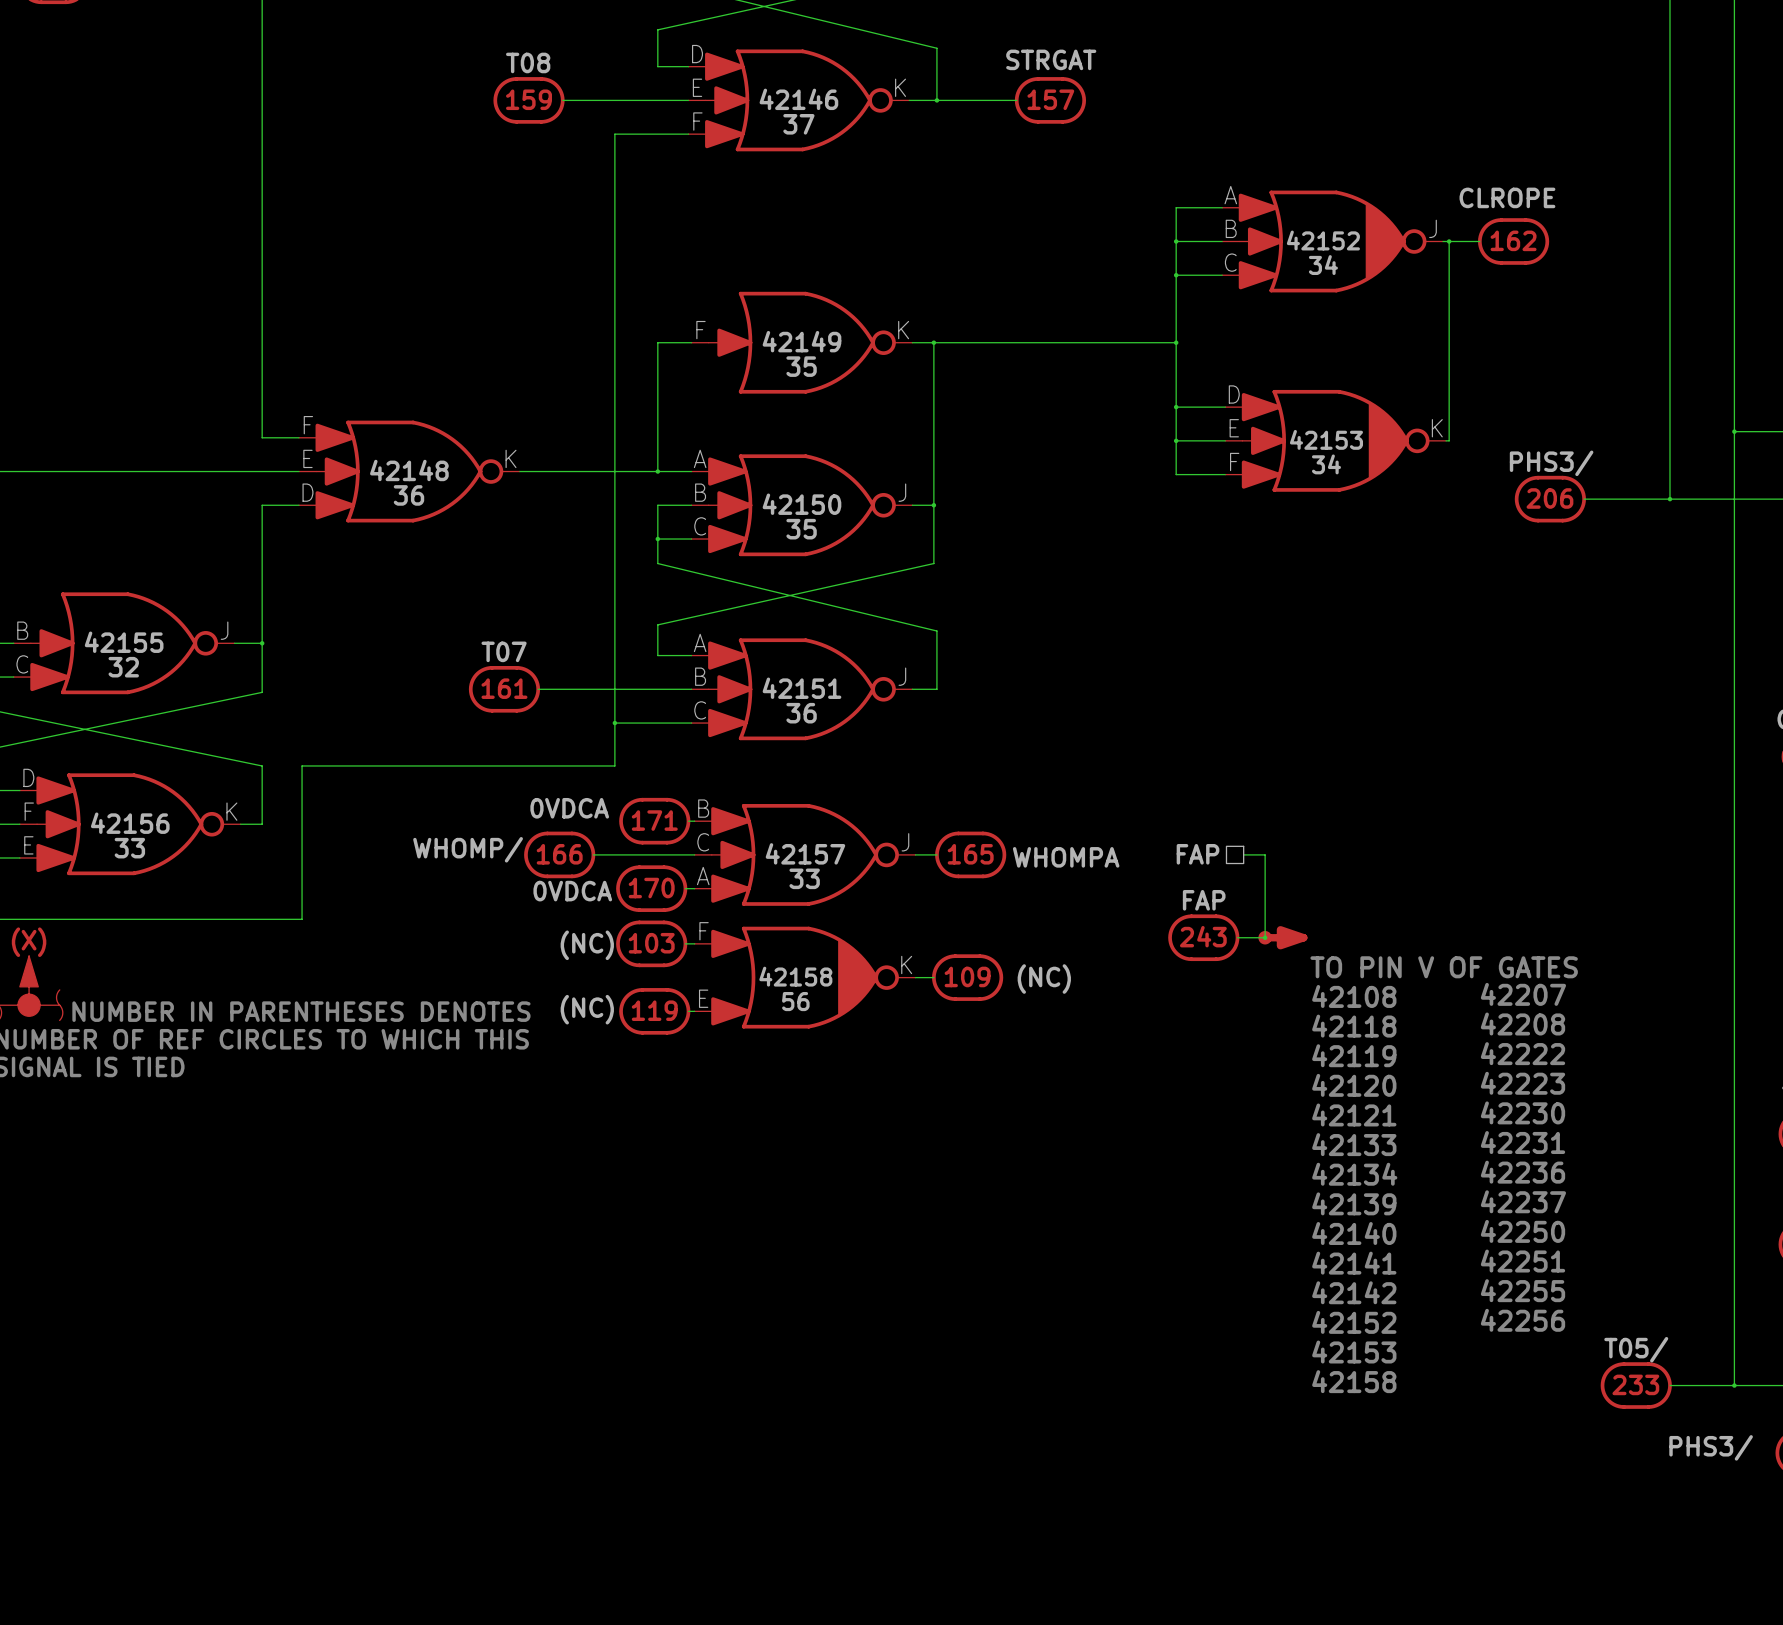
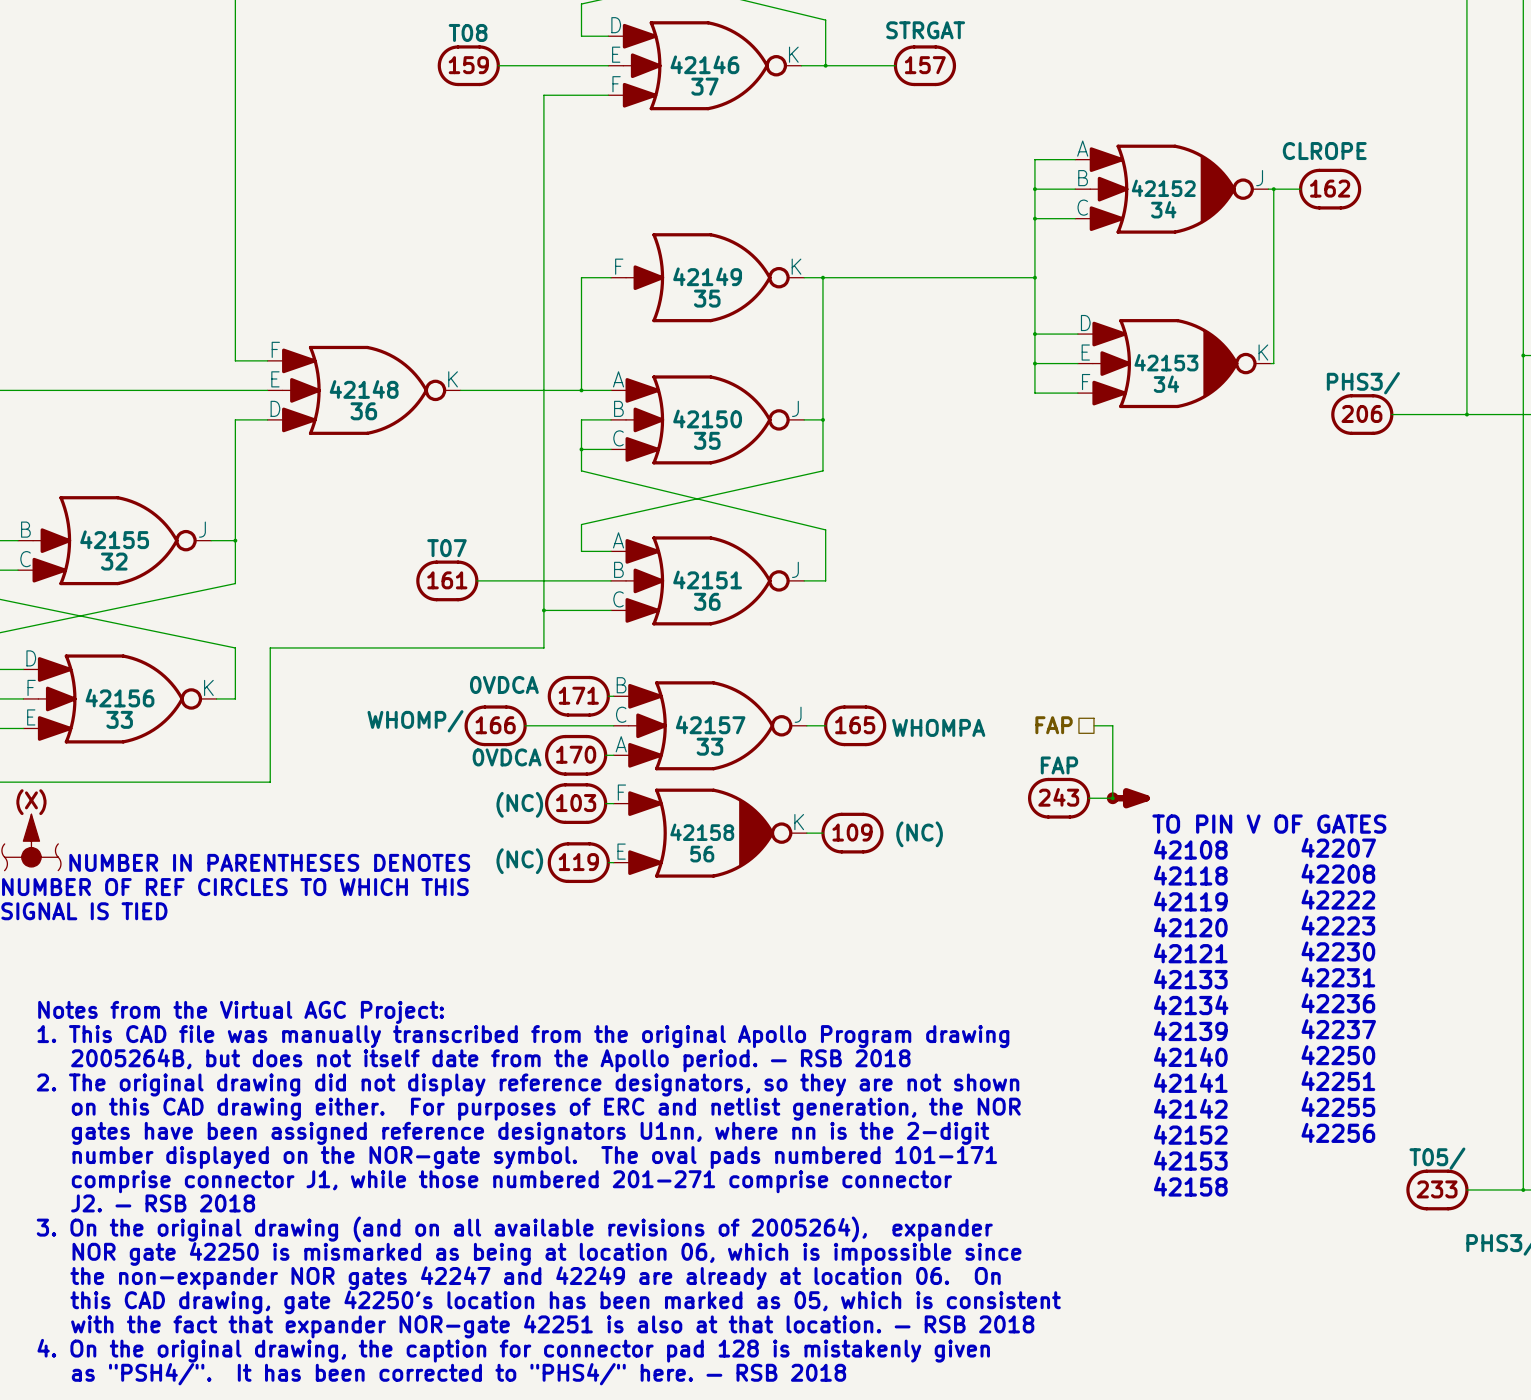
text: none -> Notes from the Virtual AGC Project: (241, 1012)
text: none -> 1. This CAD file was manually transcribed from the original Apollo Program drawing (523, 1036)
text: none -> 2005264B, but does not itself date from the Apollo period. — RSB 2018 (490, 1060)
text: none -> 2. The original drawing did not display reference designators, so they are not shown (528, 1084)
text: none -> on this CAD drawing either. For purposes of ERC and netlist generation, the NOR (546, 1109)
text: none -> gates have been assigned reference designators U1nn, where nn is the 2-digit (530, 1133)
text: none -> number displayed on the NOR-gate symbol. The oval pads numbered 101-171 (534, 1157)
text: none -> comprise connector J1, while those numbered 201-271 comprise connector (511, 1181)
text: none -> J2. — RSB 2018 (163, 1203)
text: none -> 3. On the original drawing (and on all available revisions of 2005264), expander (514, 1229)
text: none -> NOR gate 42250 is mismarked as being at location 06, which is impossible since (546, 1253)
text: none -> the non-expander NOR gates 42247 and 42249 are already at location 06. On (535, 1278)
text: none -> this CAD drawing, gate 42250's location has been marked as 05, which is consistent (565, 1302)
text: none -> with the fact that expander NOR-gate 42251 is also at that location. — RSB 2018 (552, 1326)
text: none -> 4. On the original drawing, the caption for connector pad 128 is mistakenly given (513, 1350)
text: none -> as "PSH4/". It has been corrected to "PHS4/" here. — RSB 2018 (458, 1374)

